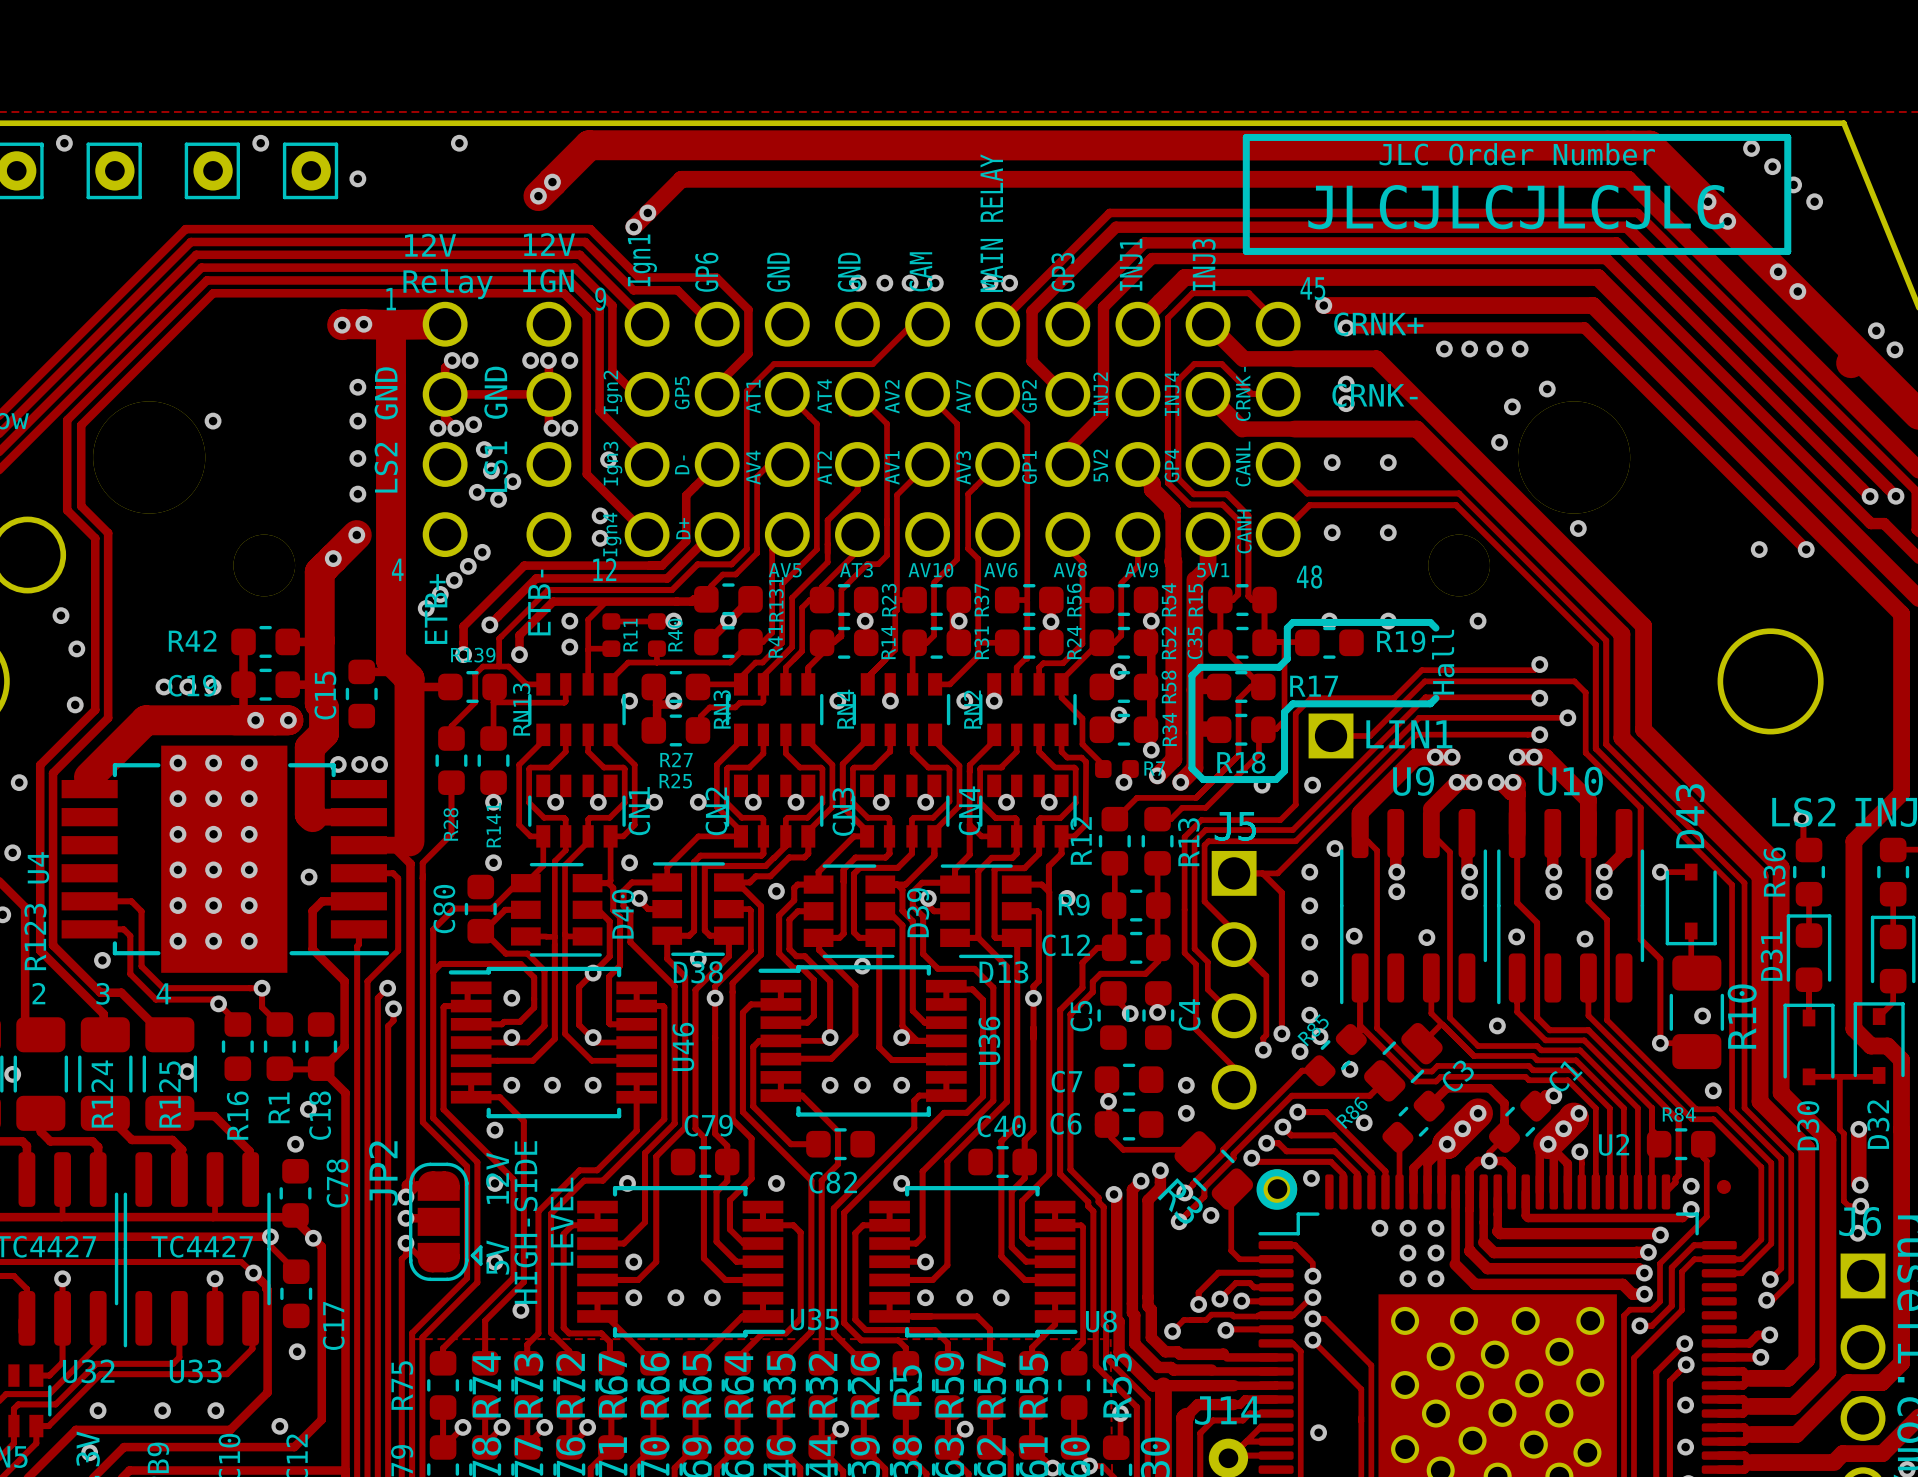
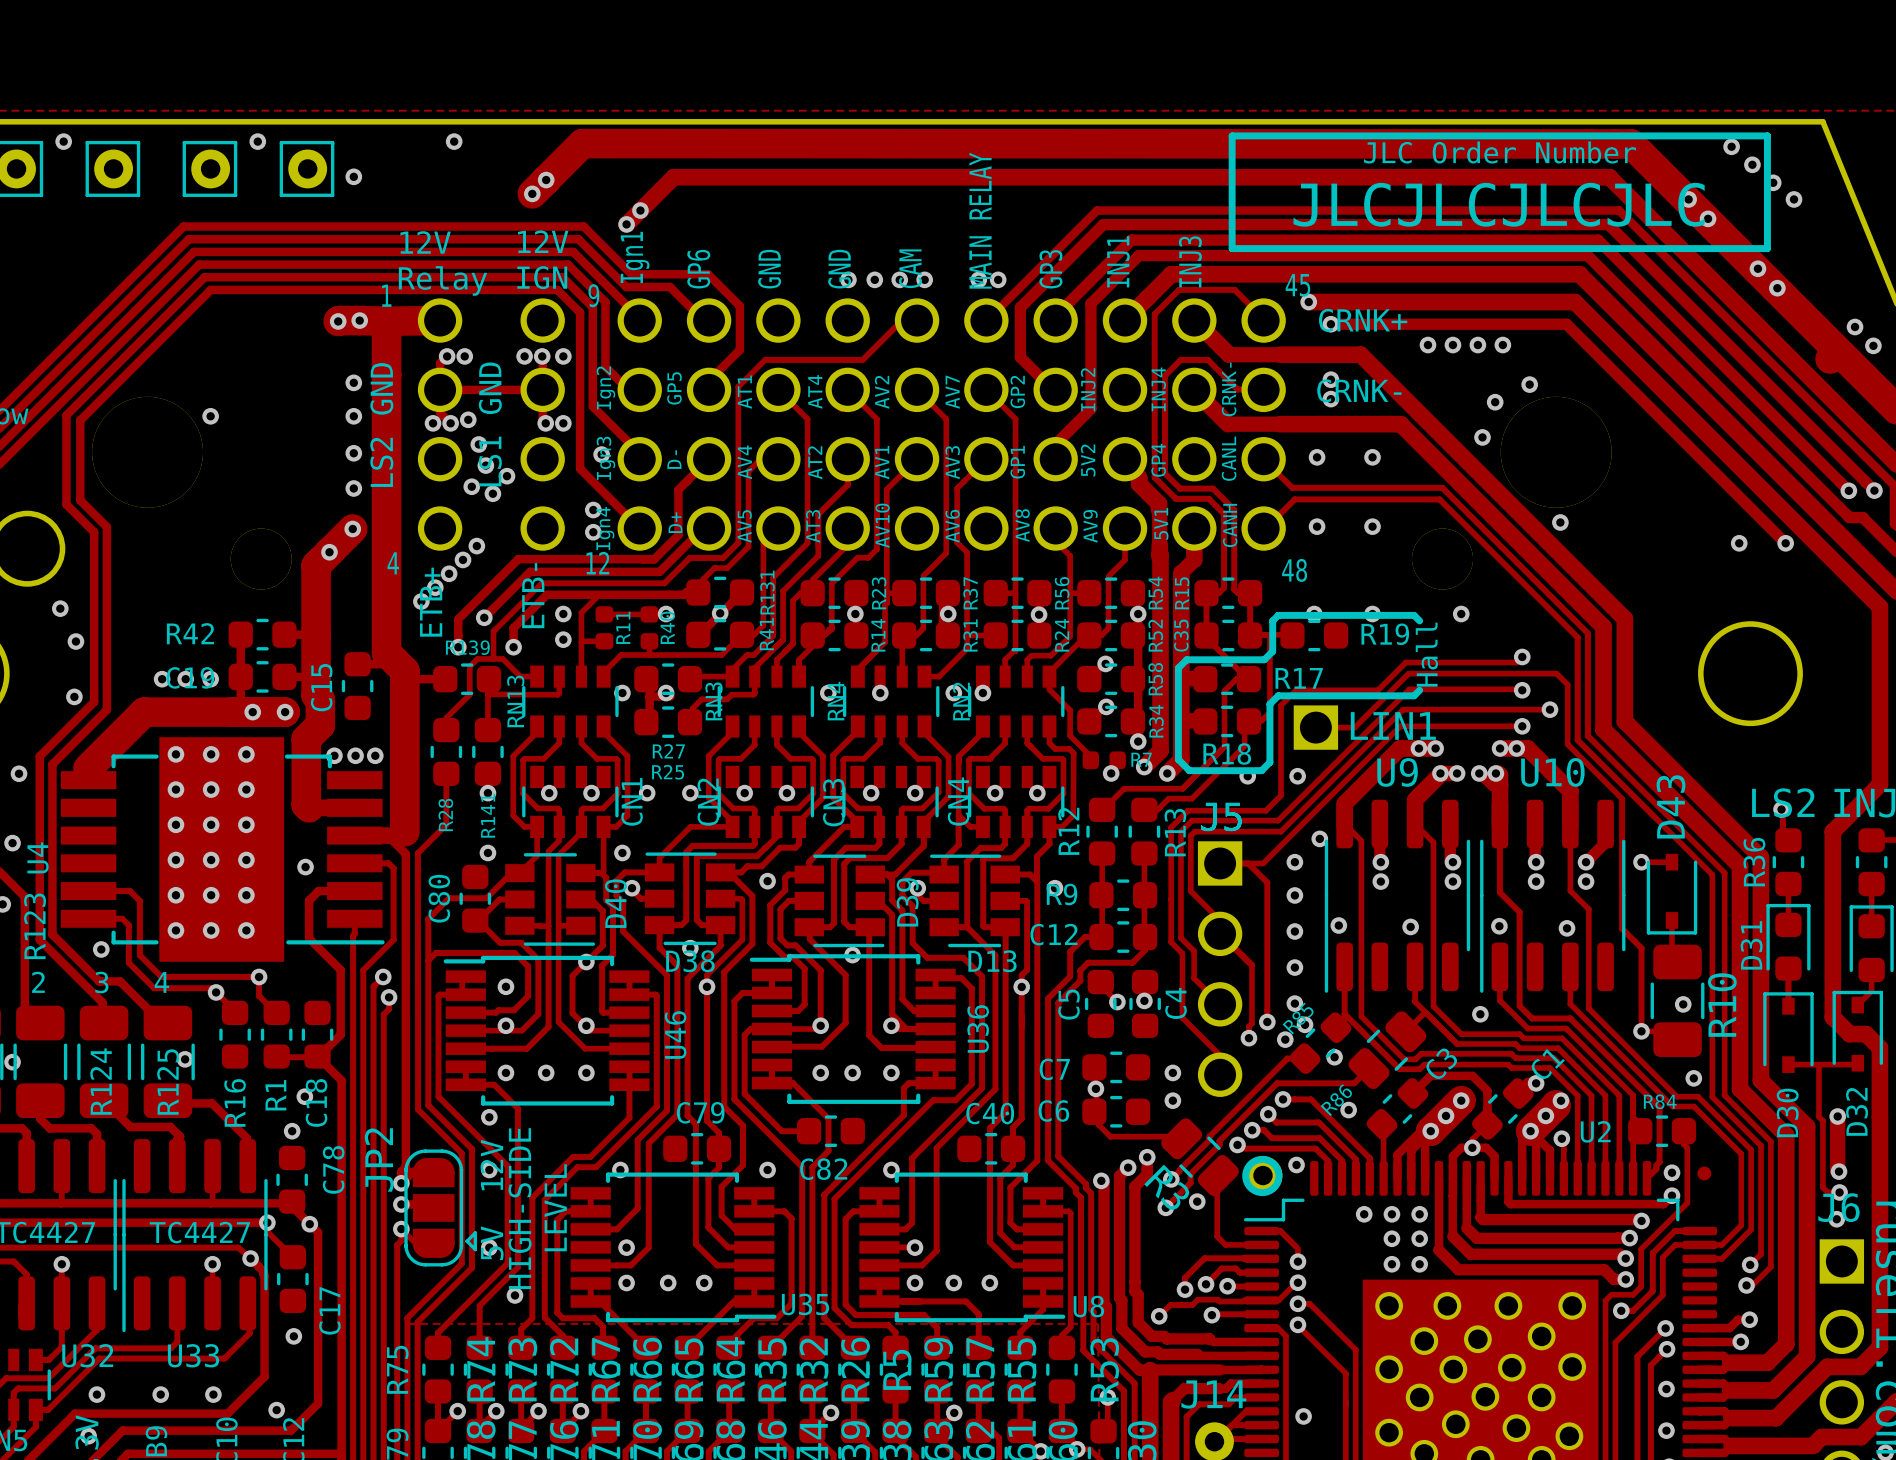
part text rotation: 0° (785, 570) -> 90° counterclockwise (744, 526)
part text rotation: 0° (856, 570) -> 90° counterclockwise (813, 526)
part text rotation: 0° (930, 570) -> 90° counterclockwise (882, 525)
part text rotation: 0° (1000, 570) -> 90° counterclockwise (952, 526)
part text rotation: 0° (1070, 570) -> 90° counterclockwise (1022, 525)
part text rotation: 0° (1141, 570) -> 90° counterclockwise (1090, 526)
part text rotation: 0° (1213, 570) -> 90° counterclockwise (1161, 523)

